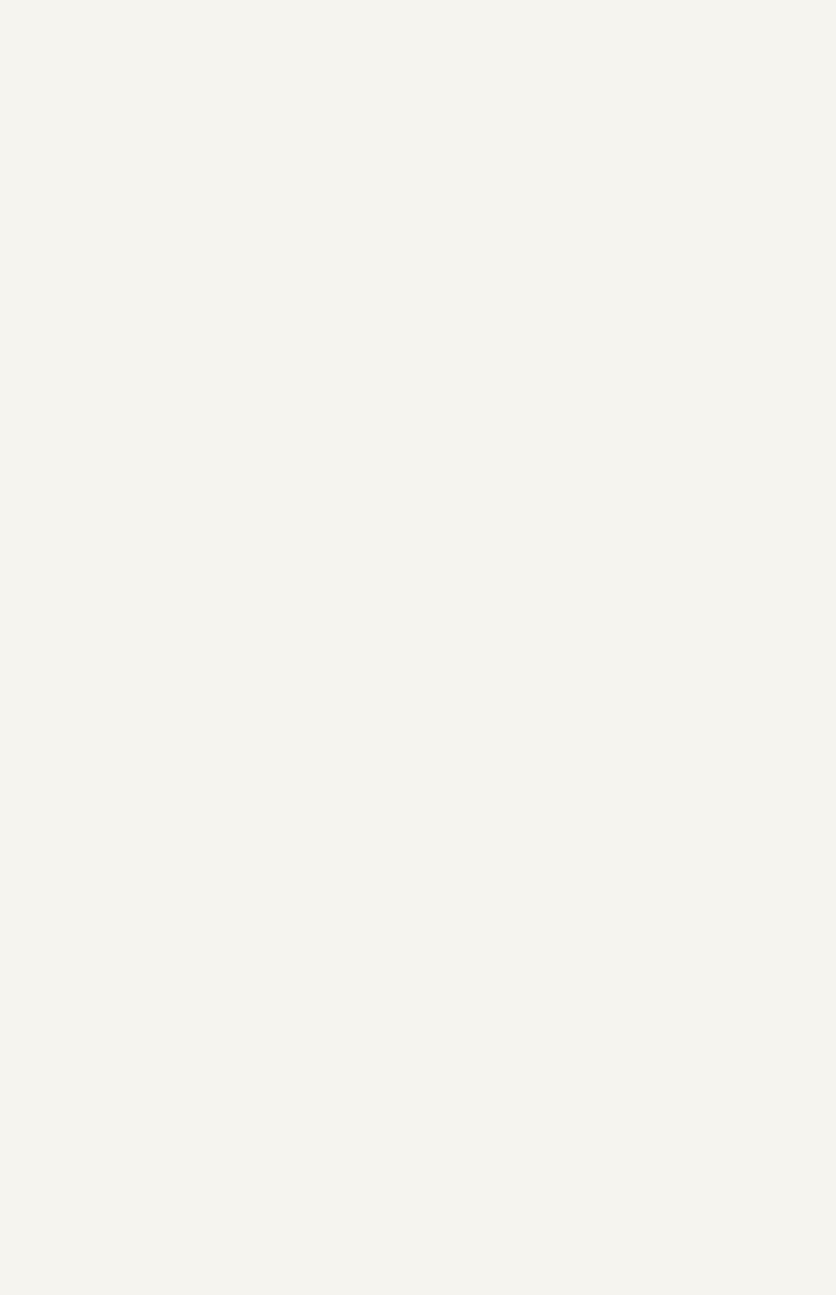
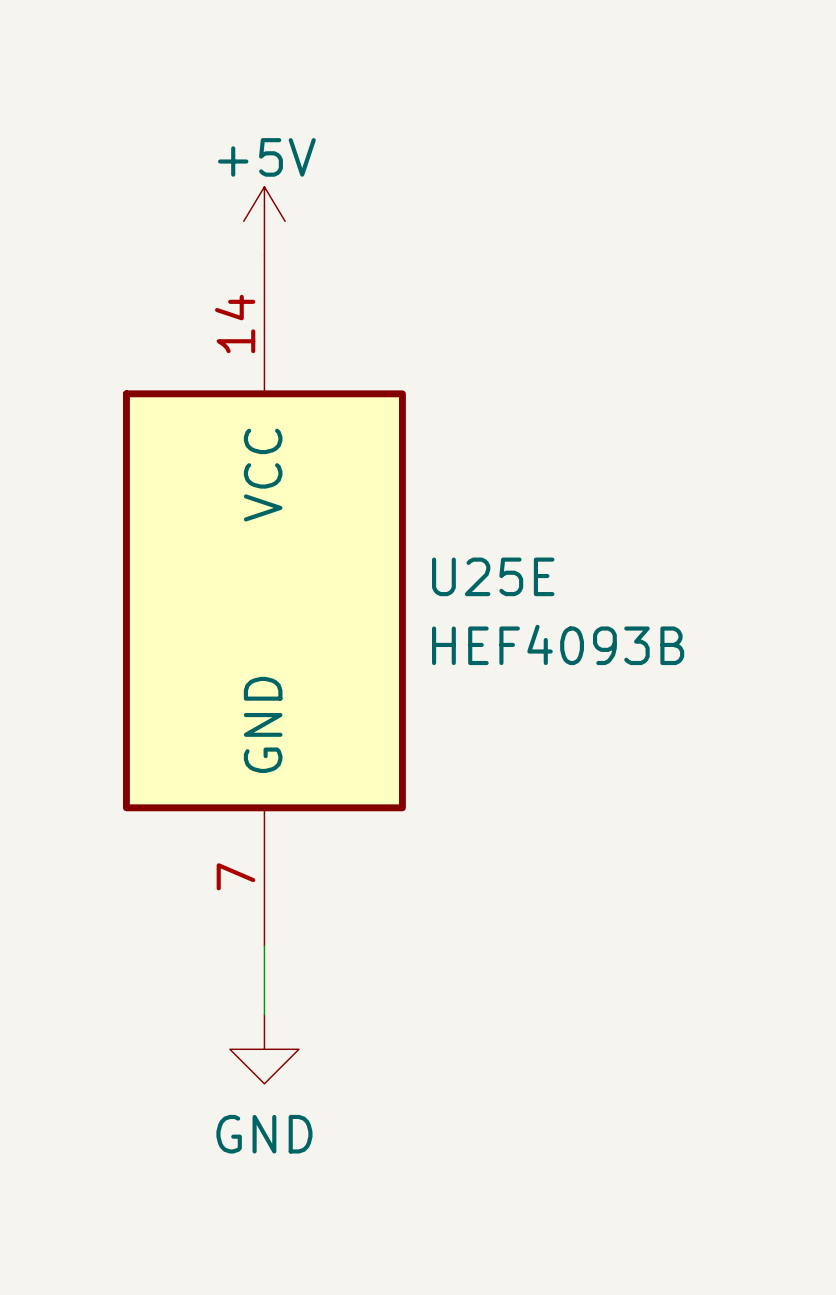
power symbol: none -> +5V (264, 221)
U25E: none -> HEF4093B (264, 600)
wire: none -> (264, 945) (264, 1014)
power symbol: none -> GND (264, 1049)

